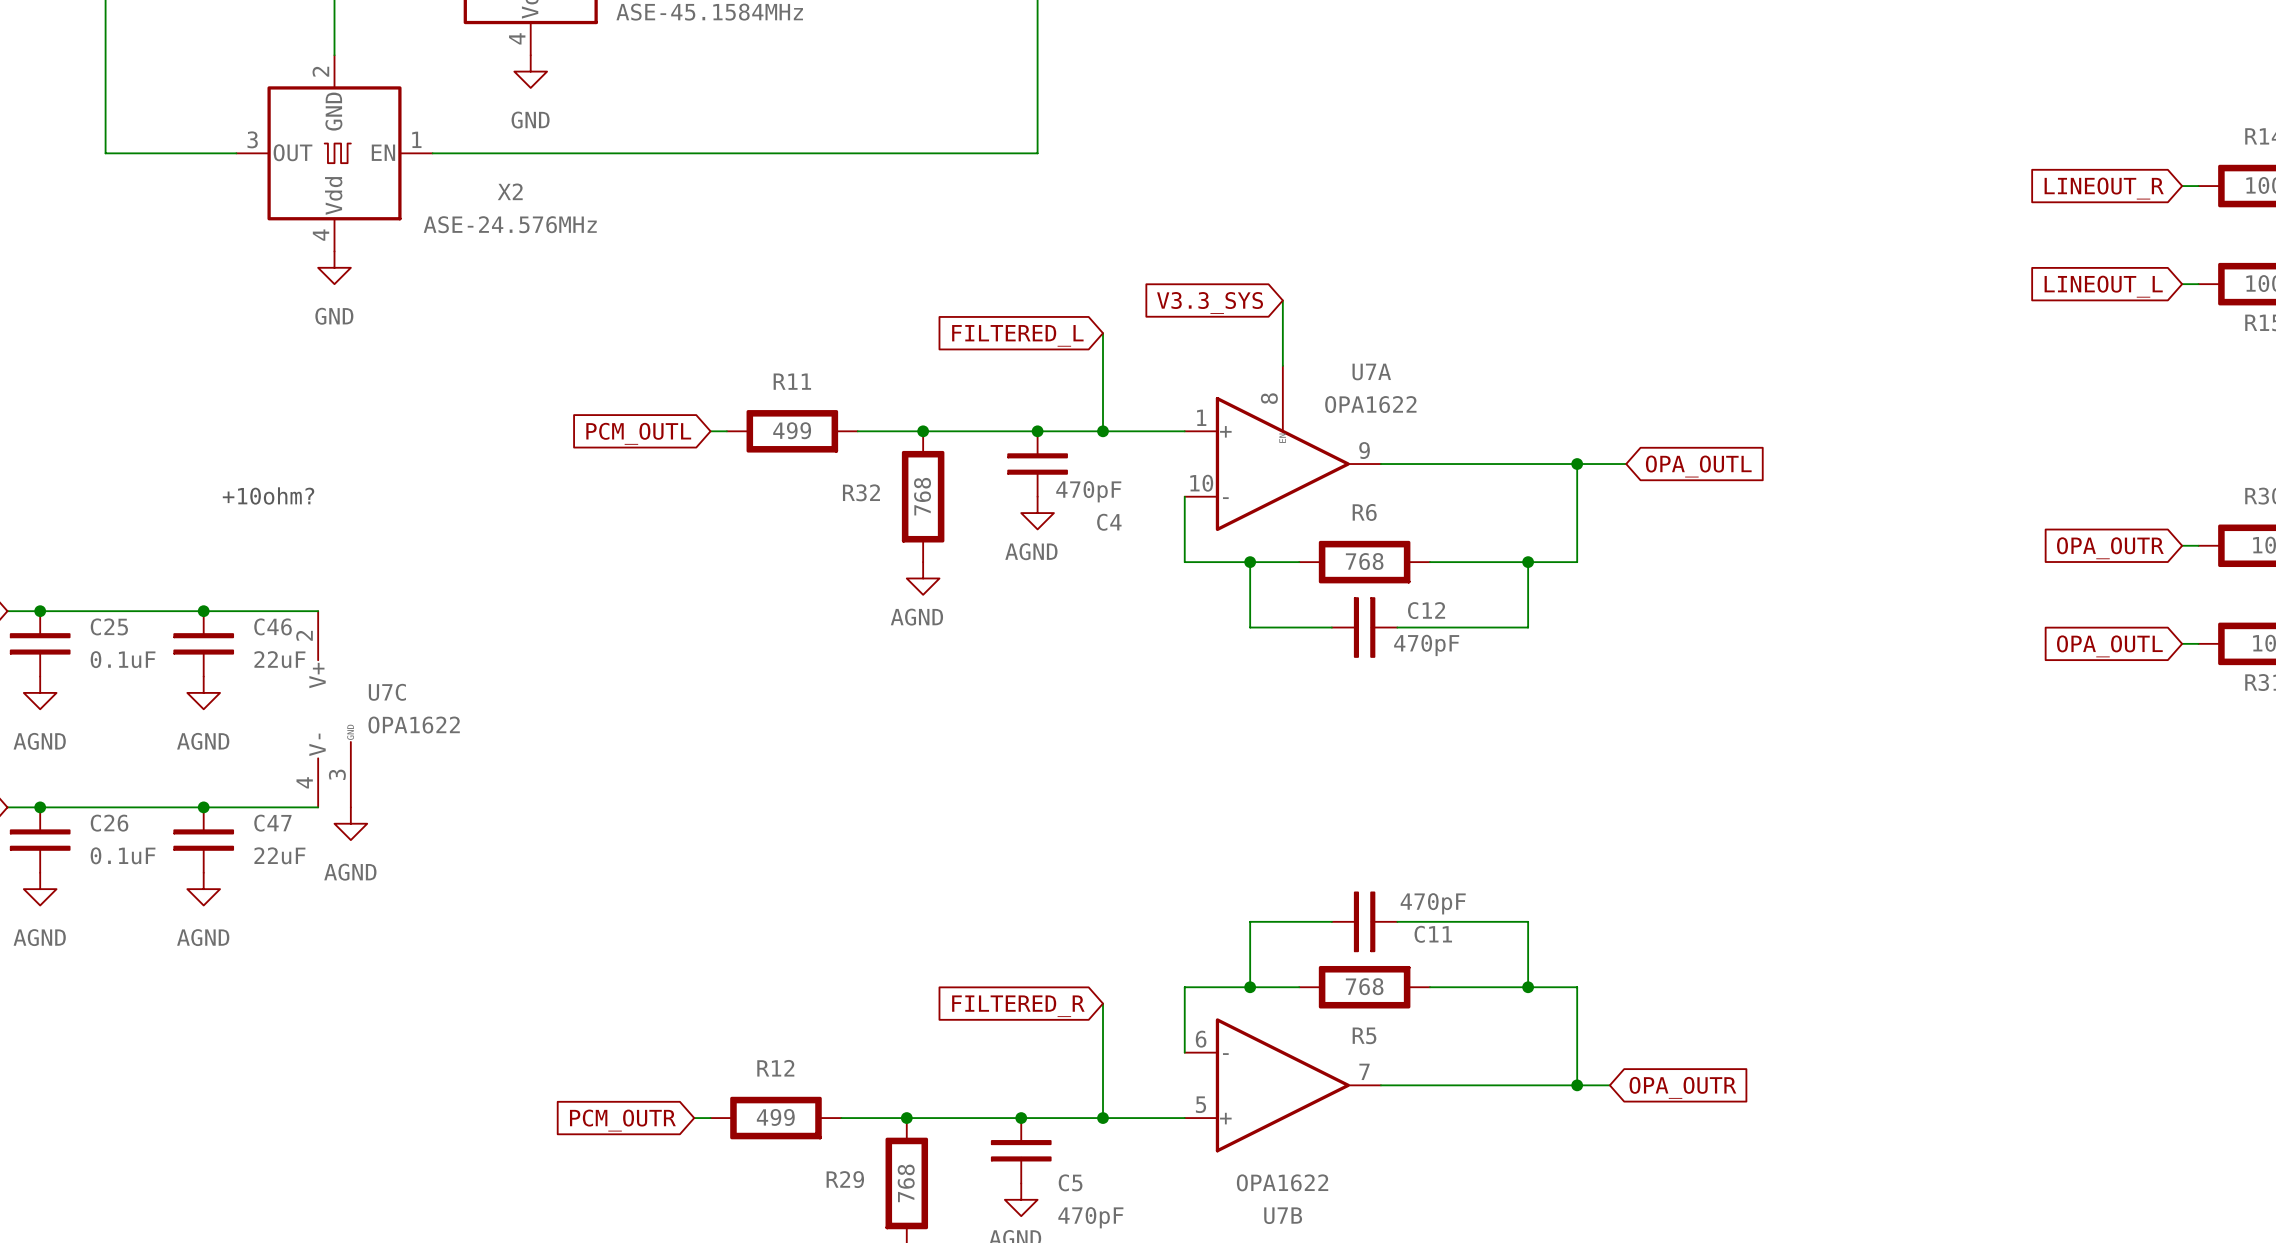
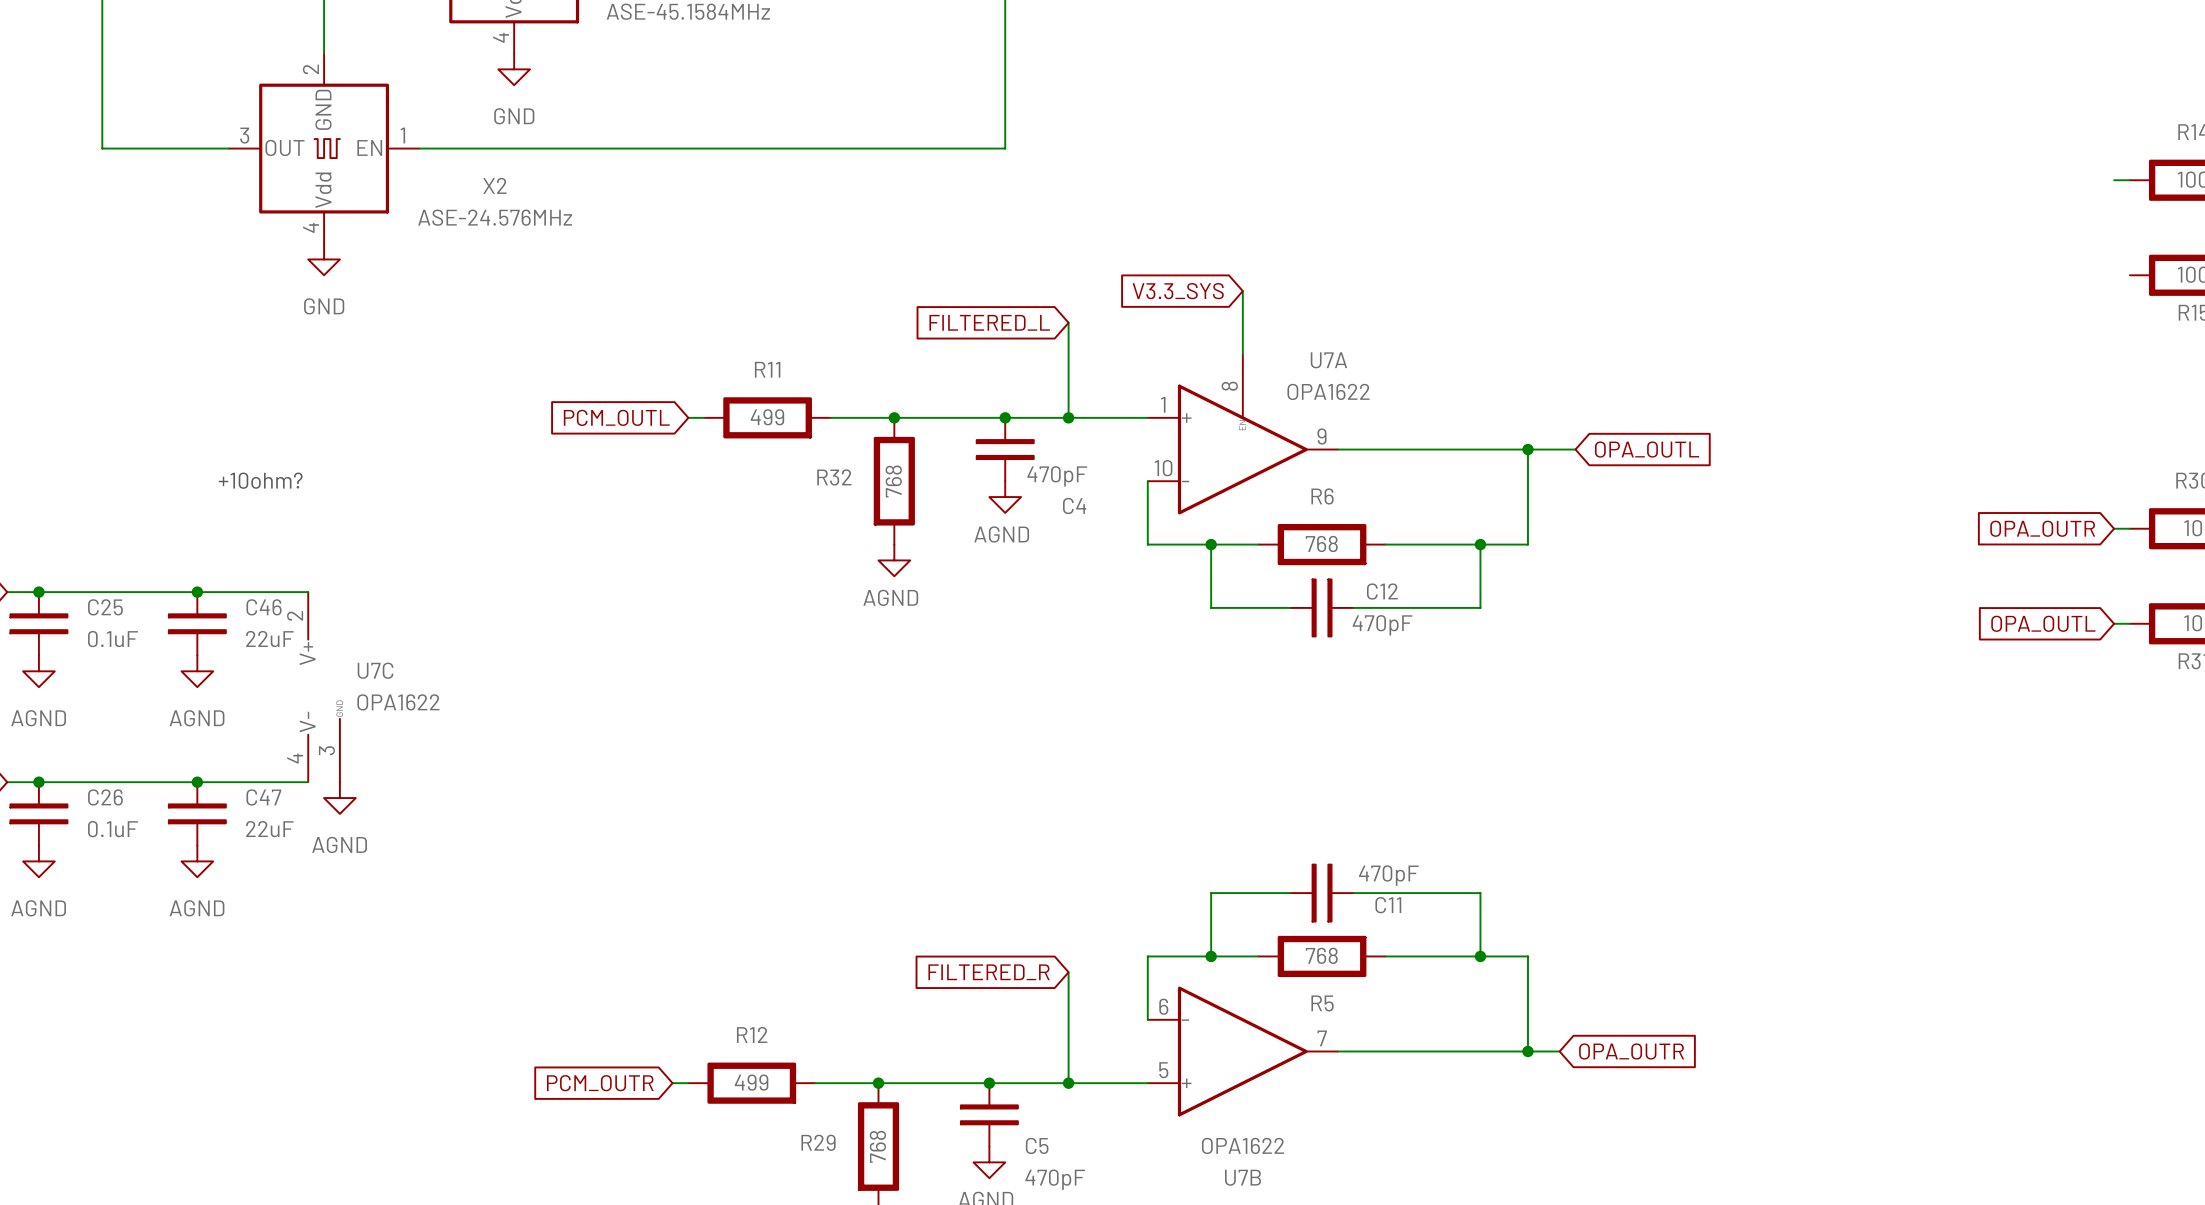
global label: LINEOUT_R (2104, 188) -> none
wire: (2182, 284) (2198, 284) -> none
global label: LINEOUT_L (2103, 286) -> none

